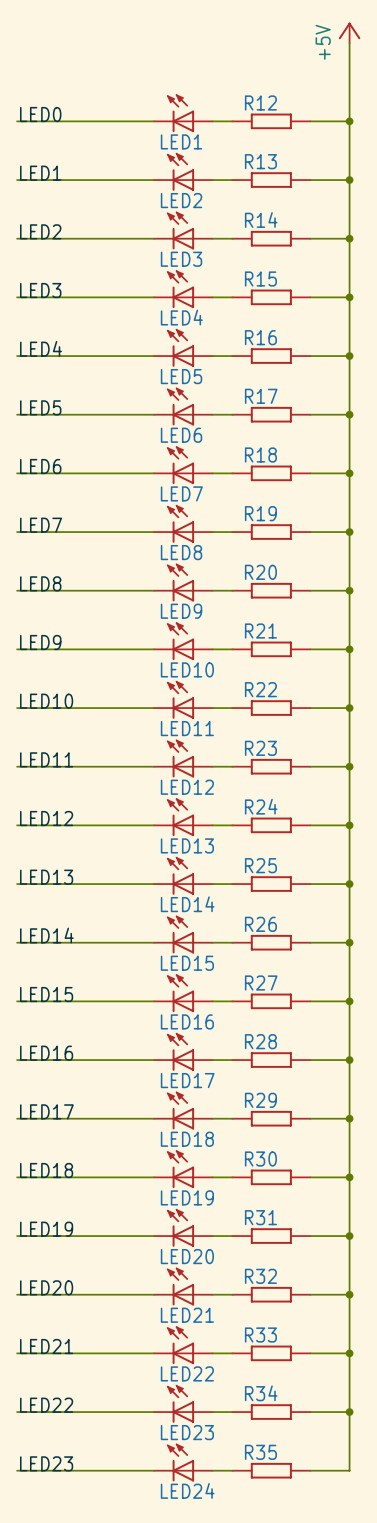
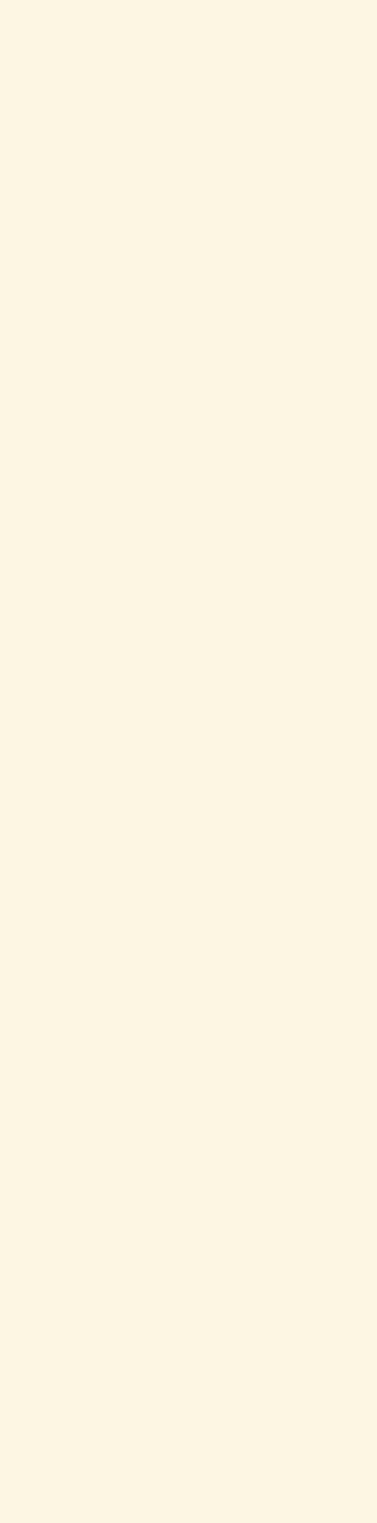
power symbol: +5V (349, 32) -> none
wire: (349, 43) (349, 1470) (310, 1470) -> none
LED1: (183, 113) -> none
label: LED0 (40, 114) -> none
wire: (17, 121) (154, 121) -> none
wire: (212, 121) (232, 121) -> none
R12: (271, 121) -> none
wire: (310, 121) (349, 121) -> none
junction: (349, 121) -> none
LED2: (183, 171) -> none
label: LED1 (40, 173) -> none
wire: (17, 180) (154, 180) -> none
wire: (212, 180) (232, 180) -> none
R13: (271, 180) -> none
wire: (310, 180) (349, 180) -> none
junction: (349, 180) -> none
LED3: (183, 230) -> none
label: LED2 (40, 231) -> none
wire: (17, 238) (154, 238) -> none
wire: (212, 238) (232, 238) -> none
R14: (271, 238) -> none
wire: (310, 238) (349, 238) -> none
junction: (349, 238) -> none
LED4: (183, 289) -> none
label: LED3 (40, 290) -> none
wire: (17, 297) (154, 297) -> none
wire: (212, 297) (232, 297) -> none
R15: (271, 297) -> none
wire: (310, 297) (349, 297) -> none
junction: (349, 297) -> none
LED5: (183, 347) -> none
label: LED4 (41, 348) -> none
wire: (17, 356) (154, 356) -> none
wire: (212, 356) (232, 356) -> none
R16: (271, 356) -> none
wire: (310, 356) (349, 356) -> none
junction: (349, 356) -> none
LED6: (183, 406) -> none
label: LED5 (40, 407) -> none
wire: (17, 414) (154, 414) -> none
wire: (212, 414) (232, 414) -> none
R17: (271, 414) -> none
wire: (310, 414) (349, 414) -> none
junction: (349, 414) -> none
LED7: (183, 465) -> none
label: LED6 (40, 466) -> none
wire: (17, 473) (154, 473) -> none
wire: (212, 473) (232, 473) -> none
R18: (271, 473) -> none
wire: (310, 473) (349, 473) -> none
junction: (349, 473) -> none
LED8: (183, 523) -> none
label: LED7 (41, 525) -> none
wire: (17, 532) (154, 532) -> none
wire: (212, 532) (232, 532) -> none
R19: (271, 532) -> none
wire: (310, 532) (349, 532) -> none
junction: (349, 532) -> none
LED9: (183, 582) -> none
label: LED8 (40, 583) -> none
wire: (17, 590) (154, 590) -> none
wire: (212, 590) (232, 590) -> none
R20: (271, 590) -> none
wire: (310, 590) (349, 590) -> none
junction: (349, 590) -> none
LED10: (183, 641) -> none
label: LED9 (40, 642) -> none
wire: (17, 649) (154, 649) -> none
wire: (212, 649) (232, 649) -> none
R21: (271, 649) -> none
wire: (310, 649) (349, 649) -> none
junction: (349, 649) -> none
LED11: (183, 699) -> none
label: LED10 (46, 701) -> none
wire: (17, 708) (154, 708) -> none
wire: (212, 708) (232, 708) -> none
R22: (271, 708) -> none
wire: (310, 708) (349, 708) -> none
junction: (349, 708) -> none
LED12: (183, 758) -> none
label: LED11 (46, 759) -> none
wire: (17, 766) (154, 766) -> none
wire: (212, 766) (232, 766) -> none
R23: (271, 766) -> none
wire: (310, 766) (349, 766) -> none
junction: (349, 766) -> none
LED13: (183, 817) -> none
label: LED12 (46, 818) -> none
wire: (17, 825) (154, 825) -> none
wire: (212, 825) (232, 825) -> none
R24: (271, 825) -> none
wire: (310, 825) (349, 825) -> none
junction: (349, 825) -> none
LED14: (183, 875) -> none
label: LED13 (46, 877) -> none
wire: (17, 884) (154, 884) -> none
wire: (212, 884) (232, 884) -> none
R25: (271, 884) -> none
wire: (310, 884) (349, 884) -> none
junction: (349, 884) -> none
LED15: (183, 934) -> none
label: LED14 (46, 935) -> none
wire: (17, 942) (154, 942) -> none
wire: (212, 942) (232, 942) -> none
R26: (271, 942) -> none
wire: (310, 942) (349, 942) -> none
junction: (349, 942) -> none
LED16: (183, 993) -> none
label: LED15 (46, 994) -> none
wire: (17, 1001) (154, 1001) -> none
wire: (212, 1001) (232, 1001) -> none
R27: (271, 1001) -> none
wire: (310, 1001) (349, 1001) -> none
junction: (349, 1001) -> none
LED17: (183, 1051) -> none
label: LED16 (46, 1053) -> none
wire: (17, 1060) (154, 1060) -> none
wire: (212, 1060) (232, 1060) -> none
R28: (271, 1060) -> none
wire: (310, 1060) (349, 1060) -> none
junction: (349, 1060) -> none
LED18: (183, 1110) -> none
label: LED17 (46, 1111) -> none
wire: (17, 1118) (154, 1118) -> none
wire: (212, 1118) (232, 1118) -> none
R29: (271, 1118) -> none
wire: (310, 1118) (349, 1118) -> none
junction: (349, 1118) -> none
LED19: (183, 1169) -> none
label: LED18 (46, 1170) -> none
wire: (17, 1177) (154, 1177) -> none
wire: (212, 1177) (232, 1177) -> none
R30: (271, 1177) -> none
wire: (310, 1177) (349, 1177) -> none
junction: (349, 1177) -> none
LED20: (183, 1227) -> none
label: LED19 (46, 1229) -> none
wire: (17, 1236) (154, 1236) -> none
wire: (212, 1236) (232, 1236) -> none
R31: (271, 1236) -> none
wire: (310, 1236) (349, 1236) -> none
junction: (349, 1236) -> none
LED21: (183, 1286) -> none
label: LED20 (46, 1287) -> none
wire: (17, 1294) (154, 1294) -> none
wire: (212, 1294) (232, 1294) -> none
R32: (271, 1294) -> none
wire: (310, 1294) (349, 1294) -> none
junction: (349, 1294) -> none
LED22: (183, 1345) -> none
label: LED21 (46, 1346) -> none
wire: (17, 1353) (154, 1353) -> none
wire: (212, 1353) (232, 1353) -> none
R33: (271, 1353) -> none
wire: (310, 1353) (349, 1353) -> none
junction: (349, 1353) -> none
LED23: (183, 1403) -> none
label: LED22 (46, 1405) -> none
wire: (17, 1412) (154, 1412) -> none
wire: (212, 1412) (232, 1412) -> none
R34: (271, 1412) -> none
wire: (310, 1412) (349, 1412) -> none
junction: (349, 1412) -> none
LED24: (183, 1462) -> none
label: LED23 (46, 1463) -> none
wire: (17, 1470) (154, 1470) -> none
wire: (212, 1470) (232, 1470) -> none
R35: (271, 1470) -> none

